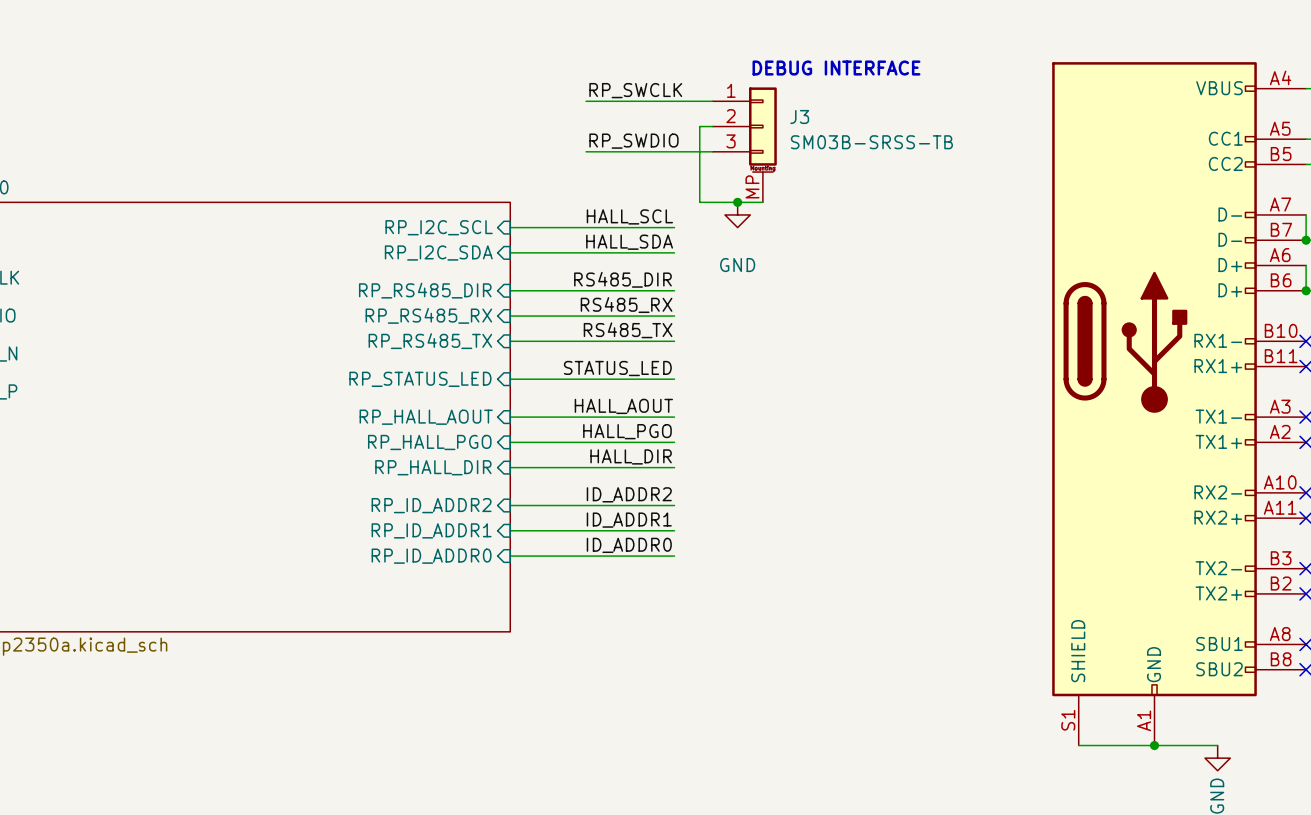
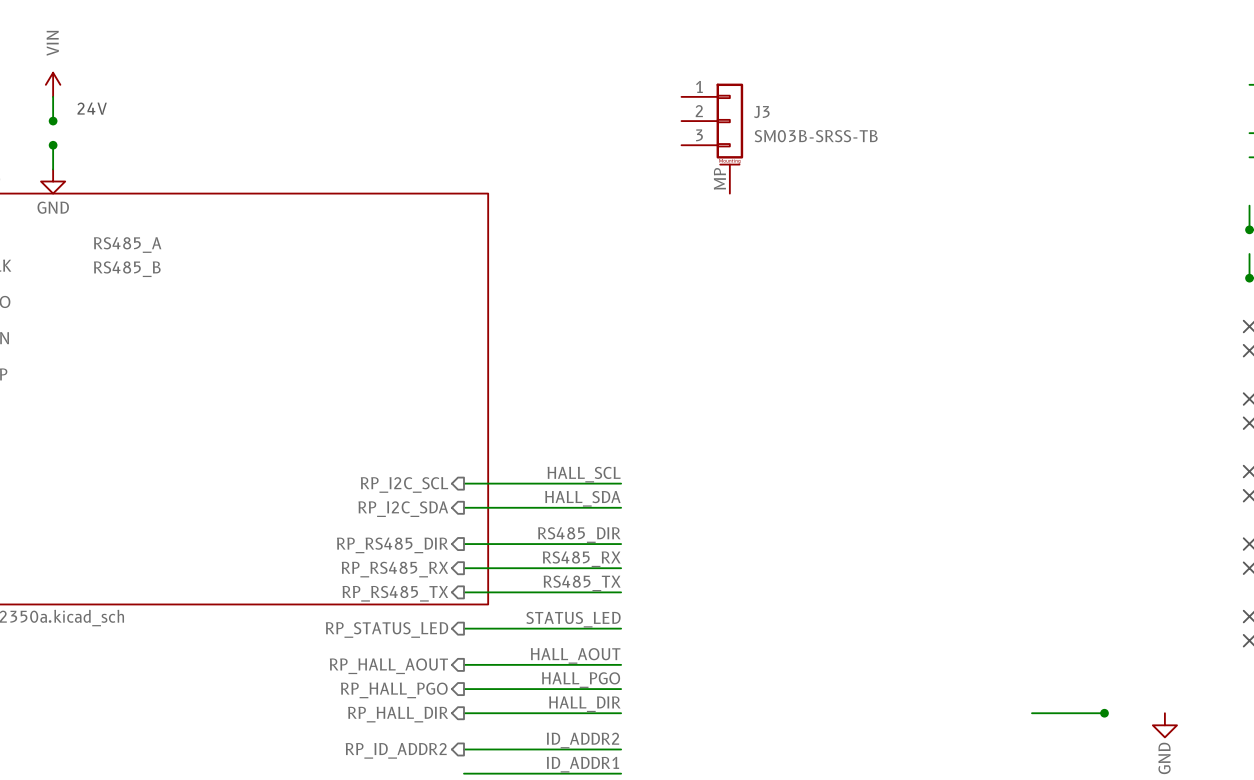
text: DEBUG INTERFACE (836, 68) -> none
power symbol: none -> VIN (53, 84)
label: RP_SWCLK (635, 90) -> none
wire: none -> (53, 96) (53, 121)
wire: (586, 101) (712, 101) -> none
text: none -> 24V (92, 108)
junction: none -> (53, 121)
wire: (712, 126) (699, 126) (699, 202) (762, 202) -> none
label: RP_SWDIO (633, 141) -> none
wire: none -> (53, 145) (53, 169)
junction: none -> (53, 145)
wire: (586, 151) (712, 151) -> none
power symbol: none -> GND (53, 181)
junction: (737, 202) -> none
power symbol: GND (737, 214) -> none
label: HALL_SCL (629, 216) -> none
sheet pin: RP_I2C_SCL (439, 227) -> none
wire: (510, 227) (674, 227) -> none
label: HALL_SDA (629, 242) -> none
wire: (510, 252) (674, 252) -> none
sheet pin: RP_I2C_SDA (438, 253) -> none
label: none -> RS485_A (127, 245)
label: none -> RS485_B (127, 269)
label: RS485_DIR (622, 279) -> none
sheet pin: RP_RS485_DIR (425, 290) -> none
wire: (510, 290) (674, 290) -> none
label: RS485_RX (626, 305) -> none
sheet pin: RP_RS485_RX (428, 315) -> none
wire: (510, 316) (674, 316) -> none
label: RS485_TX (628, 330) -> none
sheet pin: RP_RS485_TX (430, 341) -> none
wire: (510, 341) (674, 341) -> (464, 544) (621, 544)
label: STATUS_LED (617, 368) -> none
sheet pin: RP_STATUS_LED (420, 379) -> none
wire: (510, 379) (674, 379) -> (464, 592) (621, 592)
part: (1179, 403) -> none
label: HALL_AOUT (623, 406) -> none
sheet pin: RP_HALL_AOUT (426, 417) -> none
wire: (510, 417) (674, 417) -> (464, 628) (621, 628)
label: HALL_PGO (627, 431) -> none
sheet pin: RP_HALL_PGO (429, 442) -> none
wire: (510, 442) (674, 442) -> (464, 568) (621, 568)
label: HALL_DIR (631, 456) -> none
sheet pin: RP_HALL_DIR (433, 467) -> none
wire: (510, 467) (674, 467) -> (464, 664) (621, 664)
label: none -> HALL_SCL (584, 474)
label: ID_ADDR2 (629, 494) -> none
sheet pin: none -> RP_I2C_SCL (404, 484)
sheet pin: RP_ID_ADDR2 (431, 505) -> none
wire: (649, 505) (674, 505) -> (464, 483) (488, 483)
label: none -> HALL_SDA (582, 498)
label: ID_ADDR1 (629, 520) -> none
sheet pin: none -> RP_I2C_SDA (403, 509)
sheet pin: RP_ID_ADDR1 (431, 530) -> none
wire: (649, 530) (674, 530) -> (464, 507) (488, 507)
label: ID_ADDR0 (629, 545) -> none
sheet pin: RP_ID_ADDR0 (431, 556) -> none
wire: (510, 556) (674, 556) -> (464, 713) (621, 713)
label: none -> RS485_DIR (579, 535)
sheet pin: none -> RP_RS485_DIR (392, 545)
label: none -> RS485_RX (581, 559)
sheet pin: none -> RP_RS485_RX (394, 569)
label: none -> RS485_TX (582, 583)
sheet pin: none -> RP_RS485_TX (395, 593)
label: none -> STATUS_LED (573, 619)
sheet pin: none -> RP_STATUS_LED (387, 629)
label: none -> HALL_AOUT (575, 655)
sheet pin: none -> RP_HALL_AOUT (388, 666)
label: none -> HALL_PGO (581, 680)
sheet pin: none -> RP_HALL_PGO (394, 690)
wire: none -> (464, 689) (621, 689)
label: none -> HALL_DIR (584, 704)
sheet pin: none -> RP_HALL_DIR (398, 714)
wire: (1154, 745) (1217, 745) -> none
label: none -> ID_ADDR2 (583, 740)
sheet pin: none -> RP_ID_ADDR2 (396, 750)
wire: none -> (464, 749) (621, 749)
label: none -> ID_ADDR1 (582, 764)
wire: none -> (464, 773) (621, 773)

